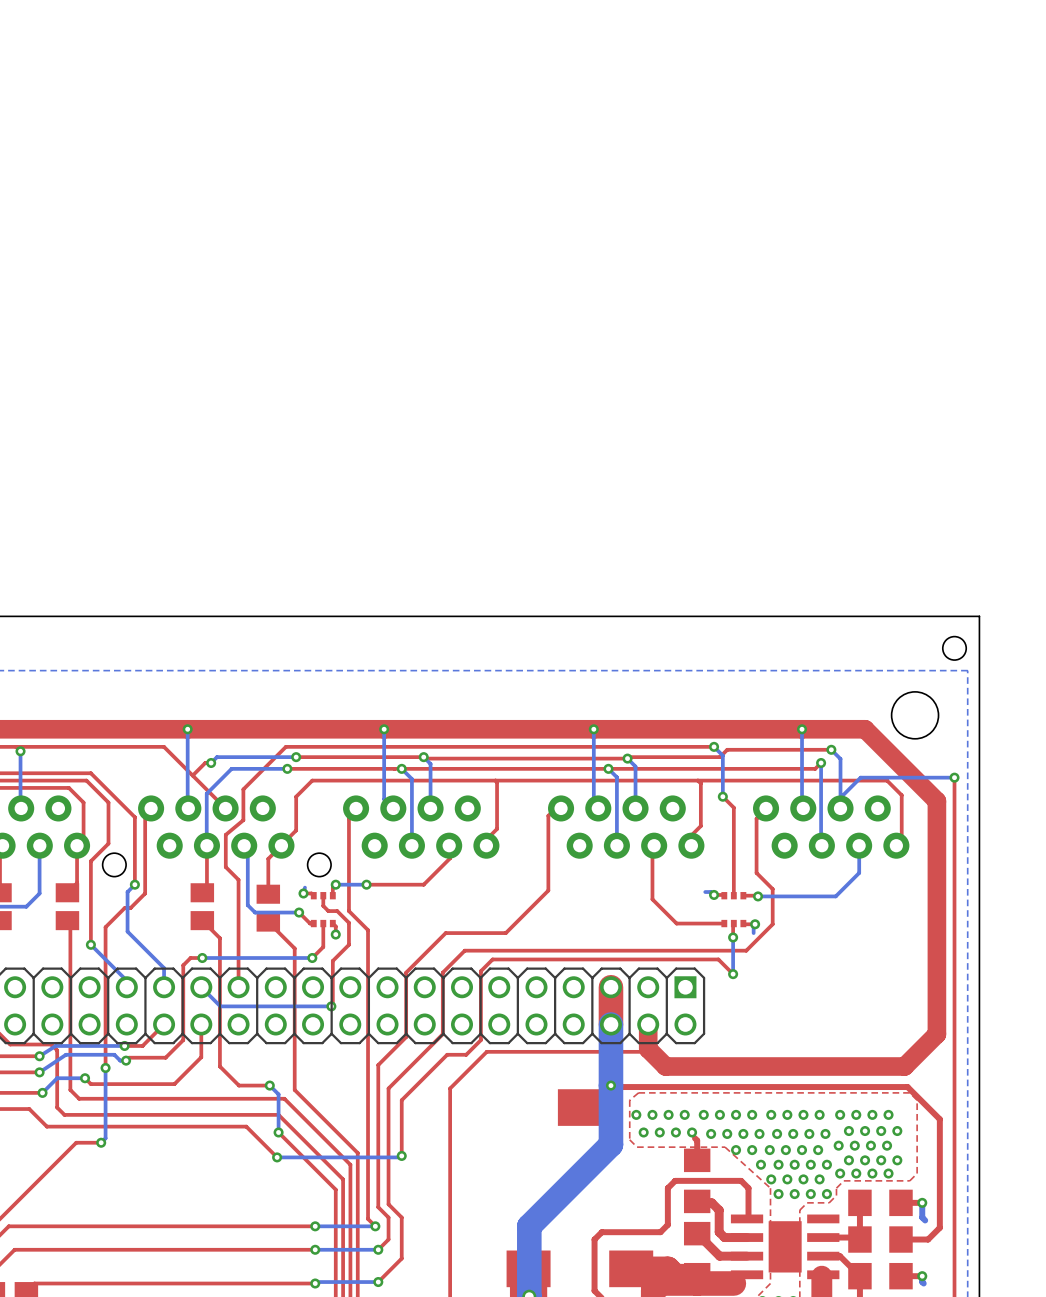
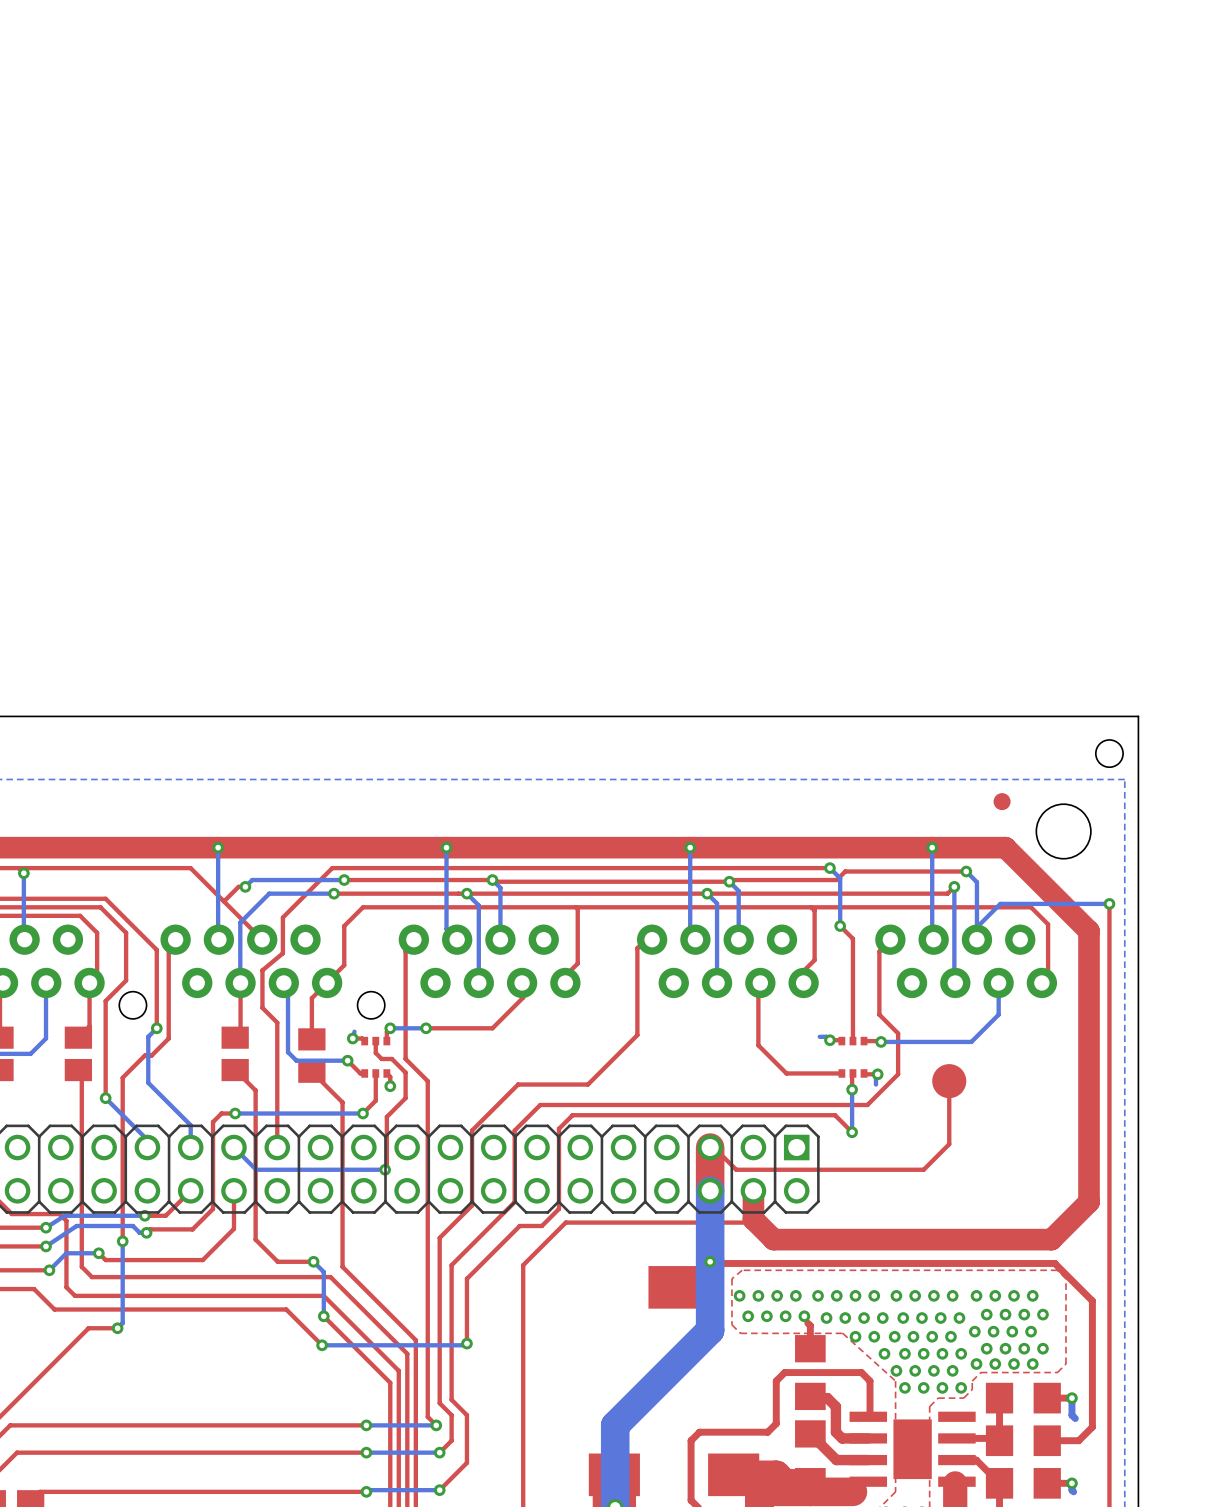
part: none -> (1002, 801)
top track: none -> (949, 1081) (949, 1144) (923, 1169) (736, 1169) (713, 1147) (710, 1147)
part: none -> (949, 1081)

